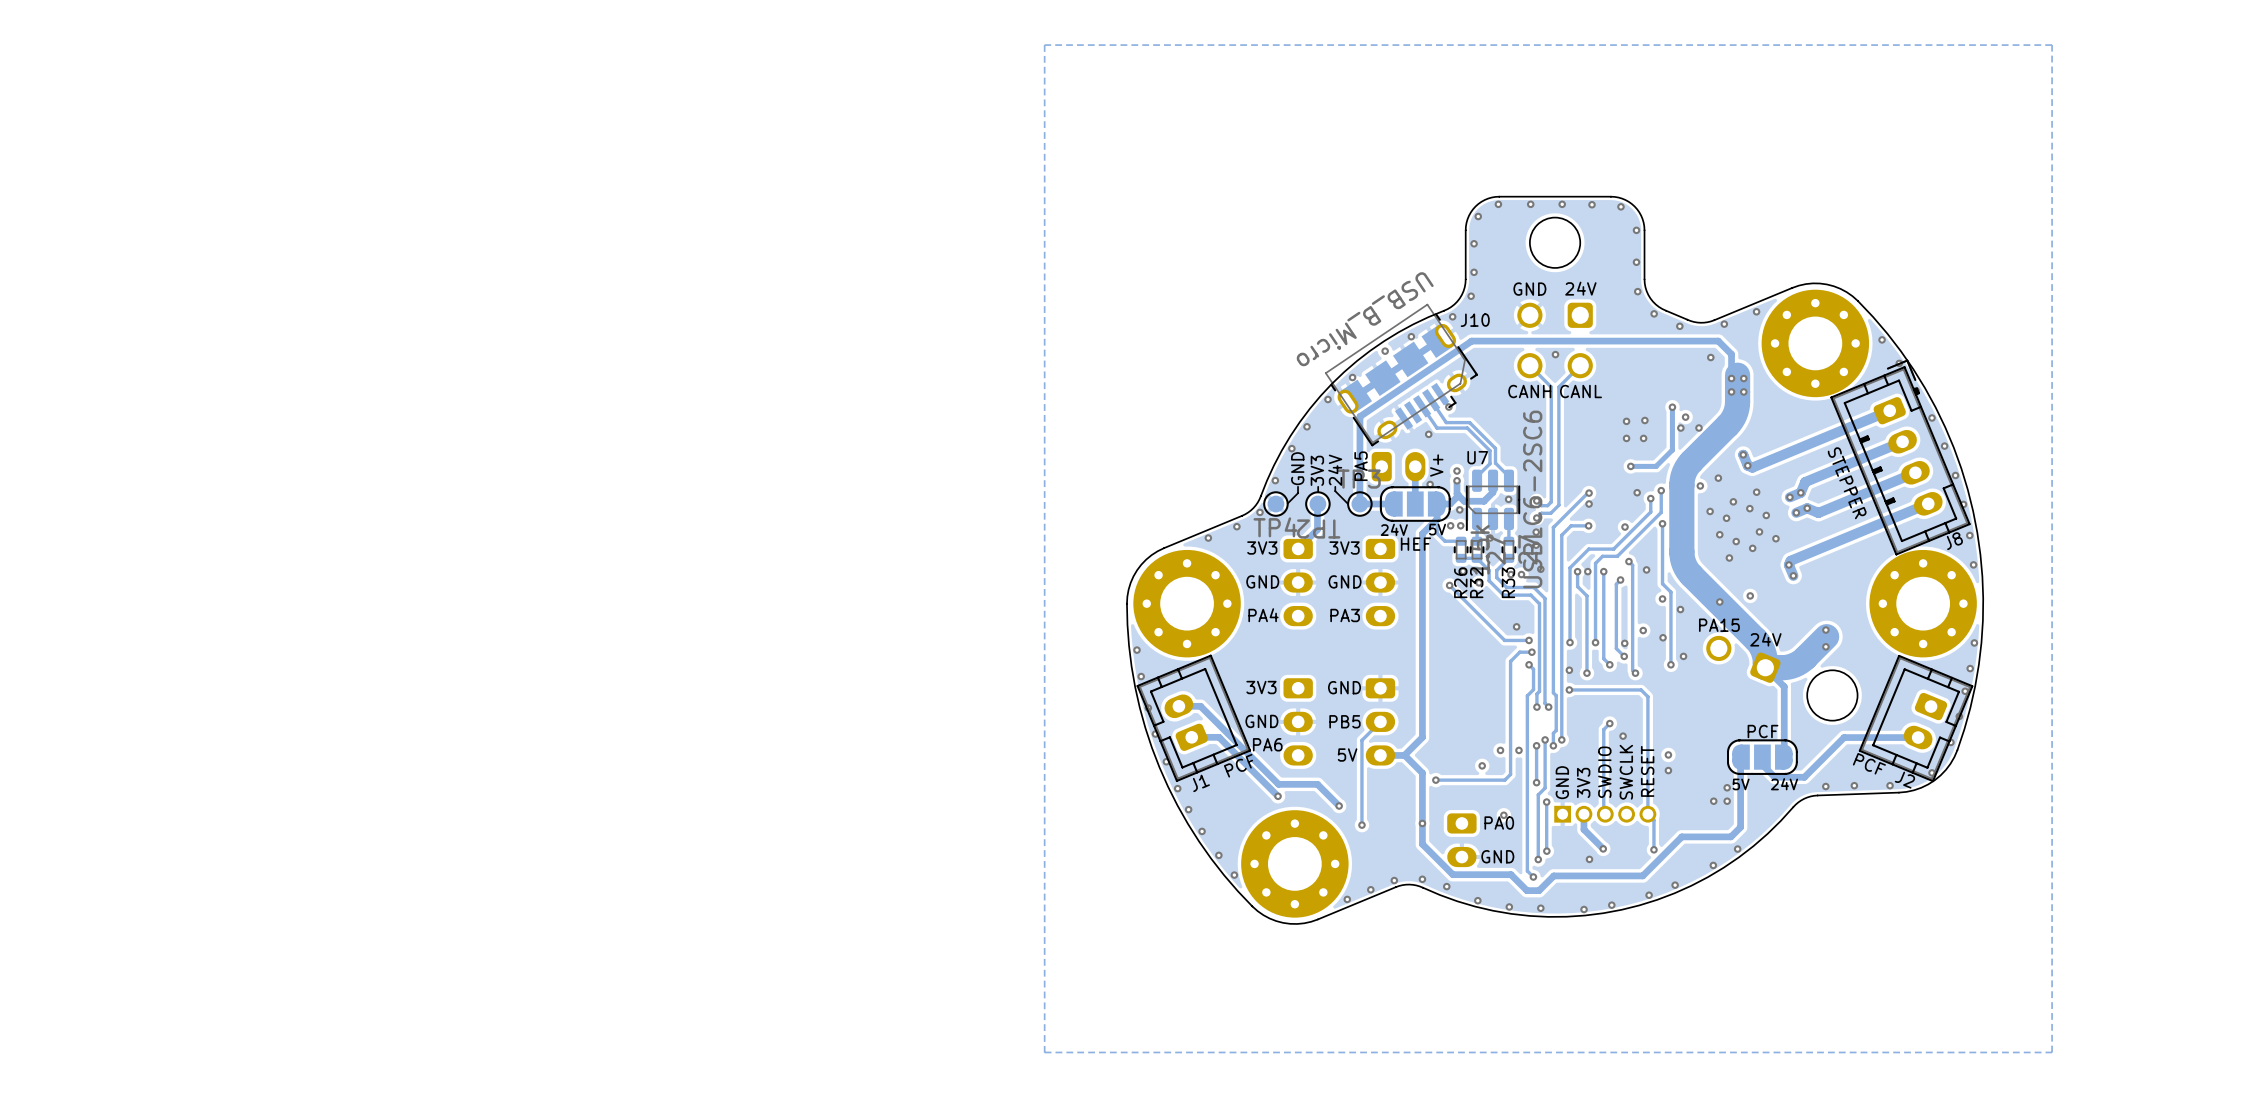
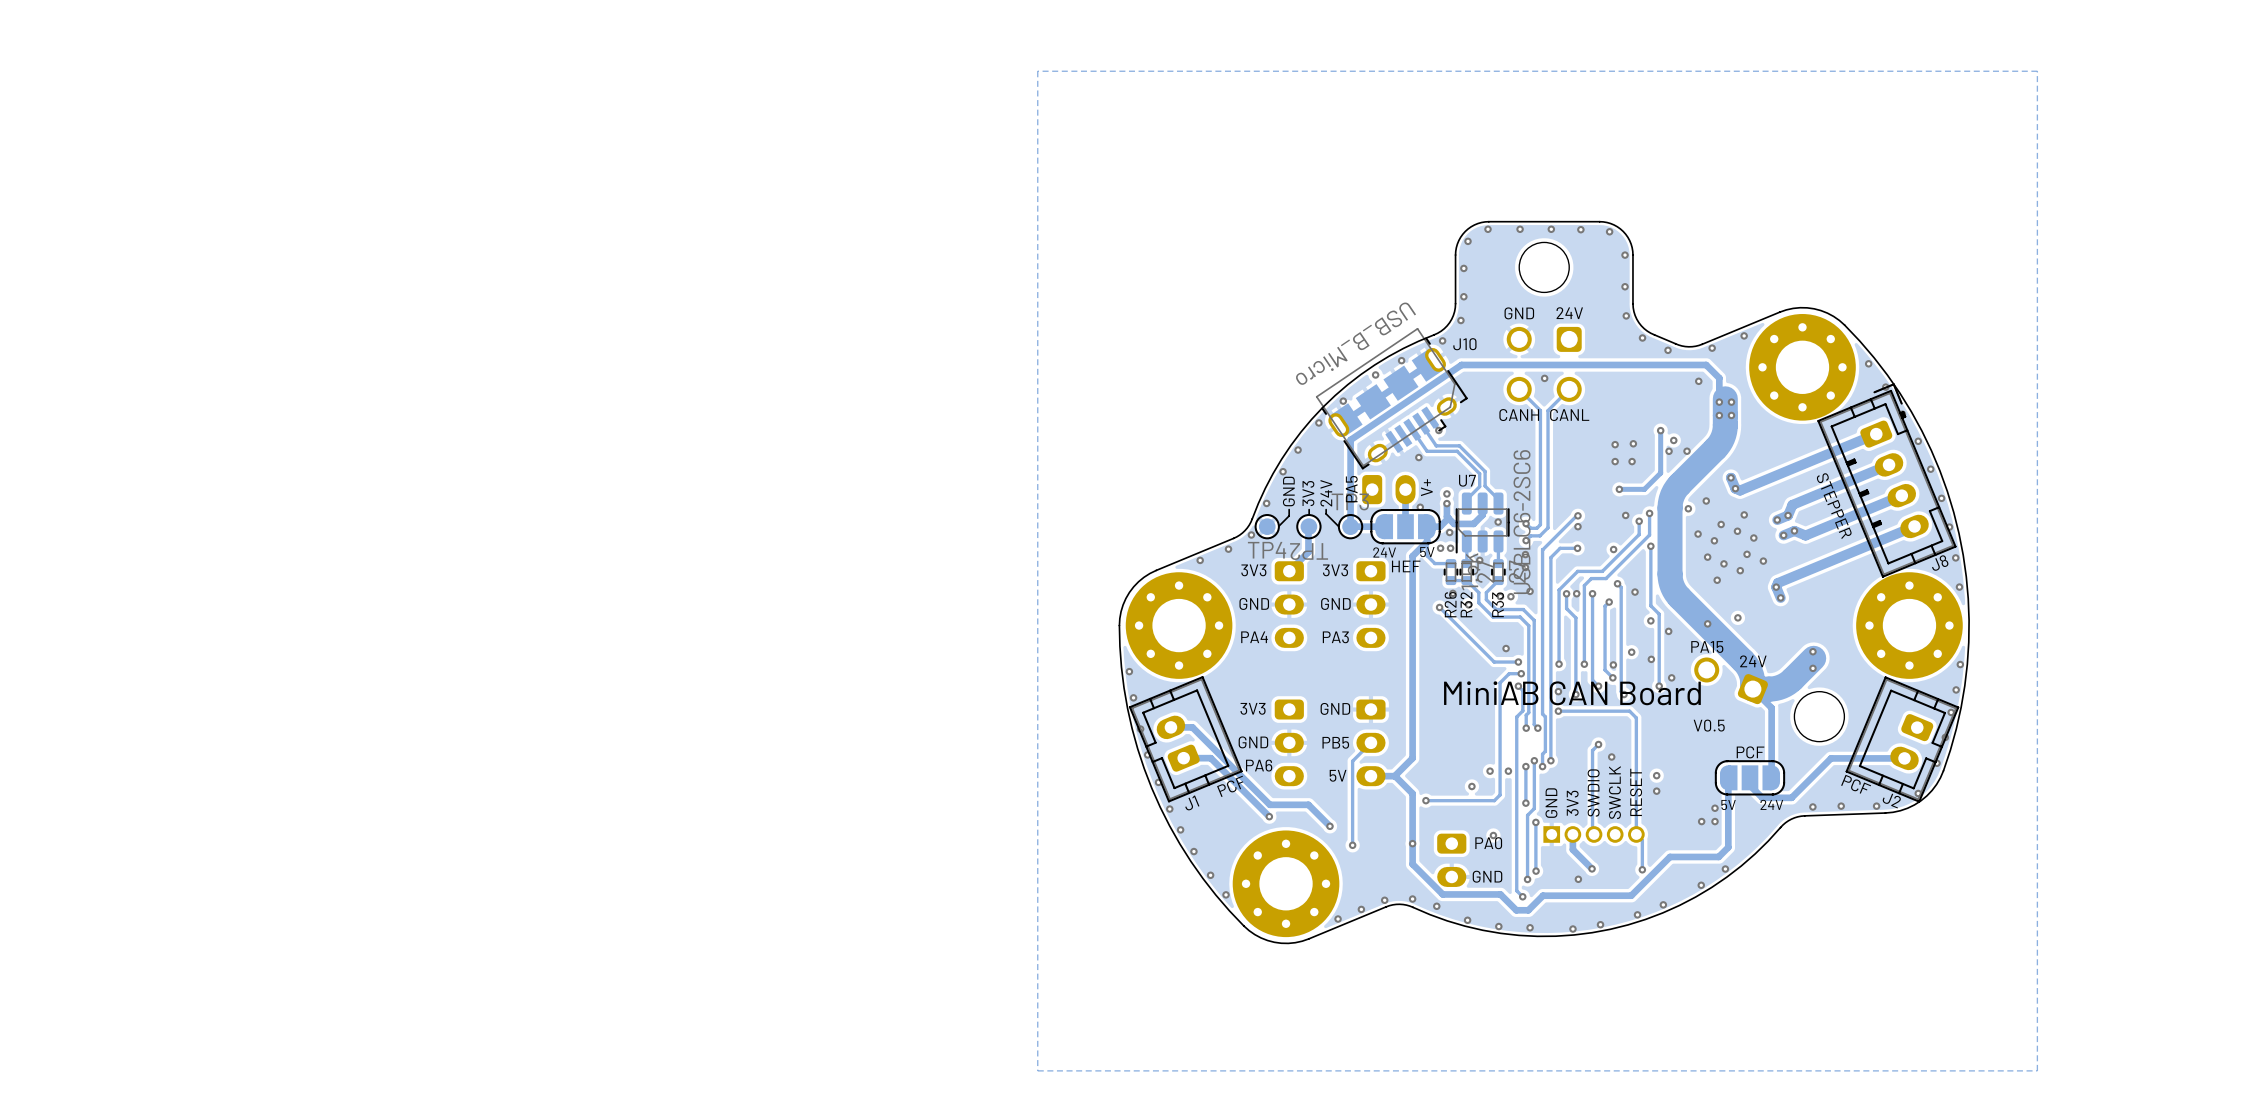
text: none -> MiniAB CAN Board (1572, 693)
text: none -> V0.5 (1709, 725)

